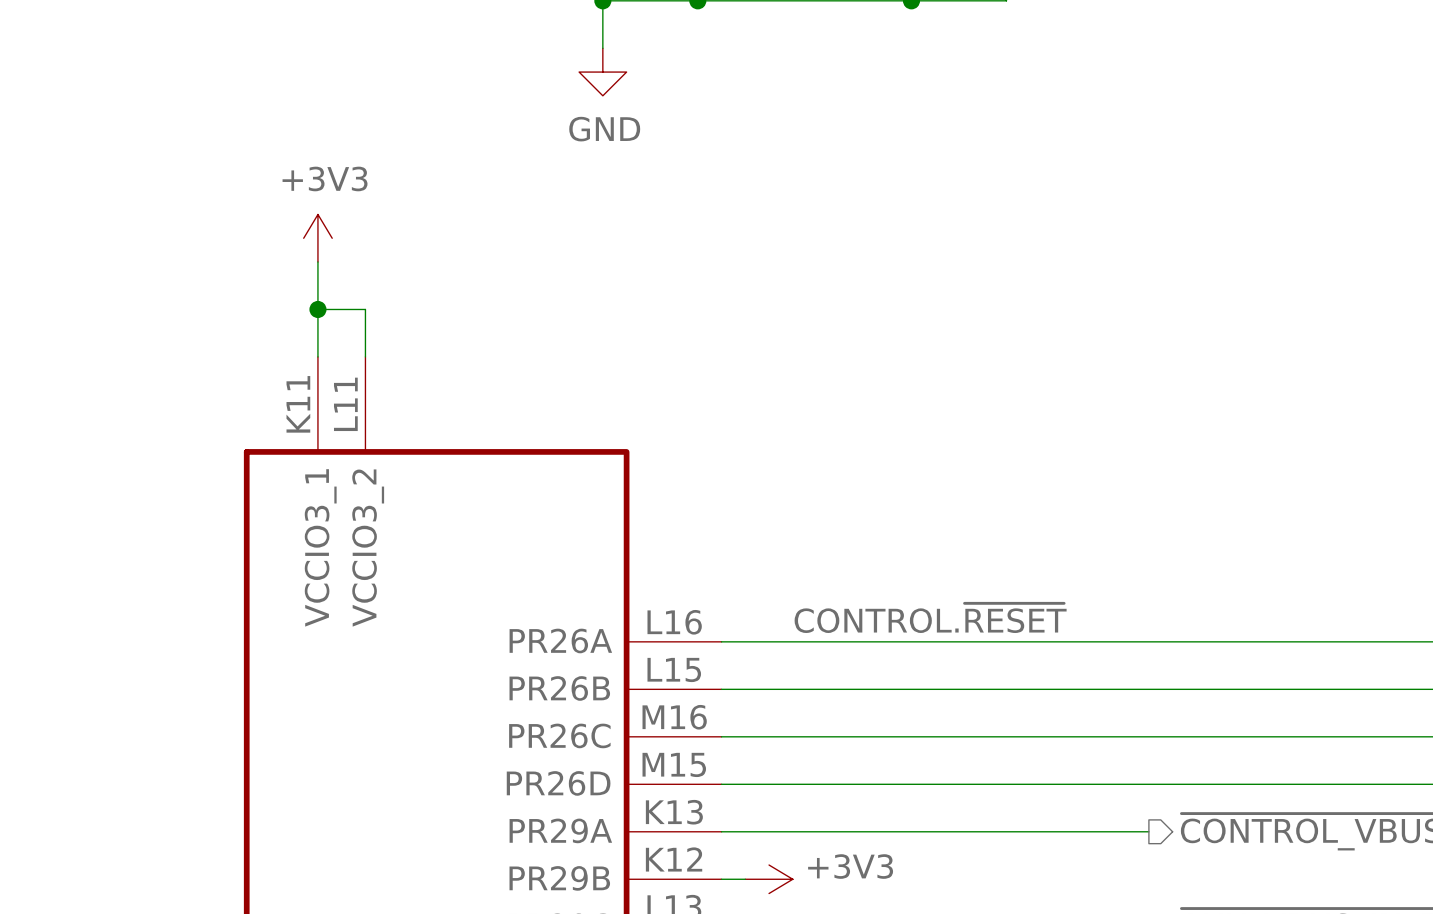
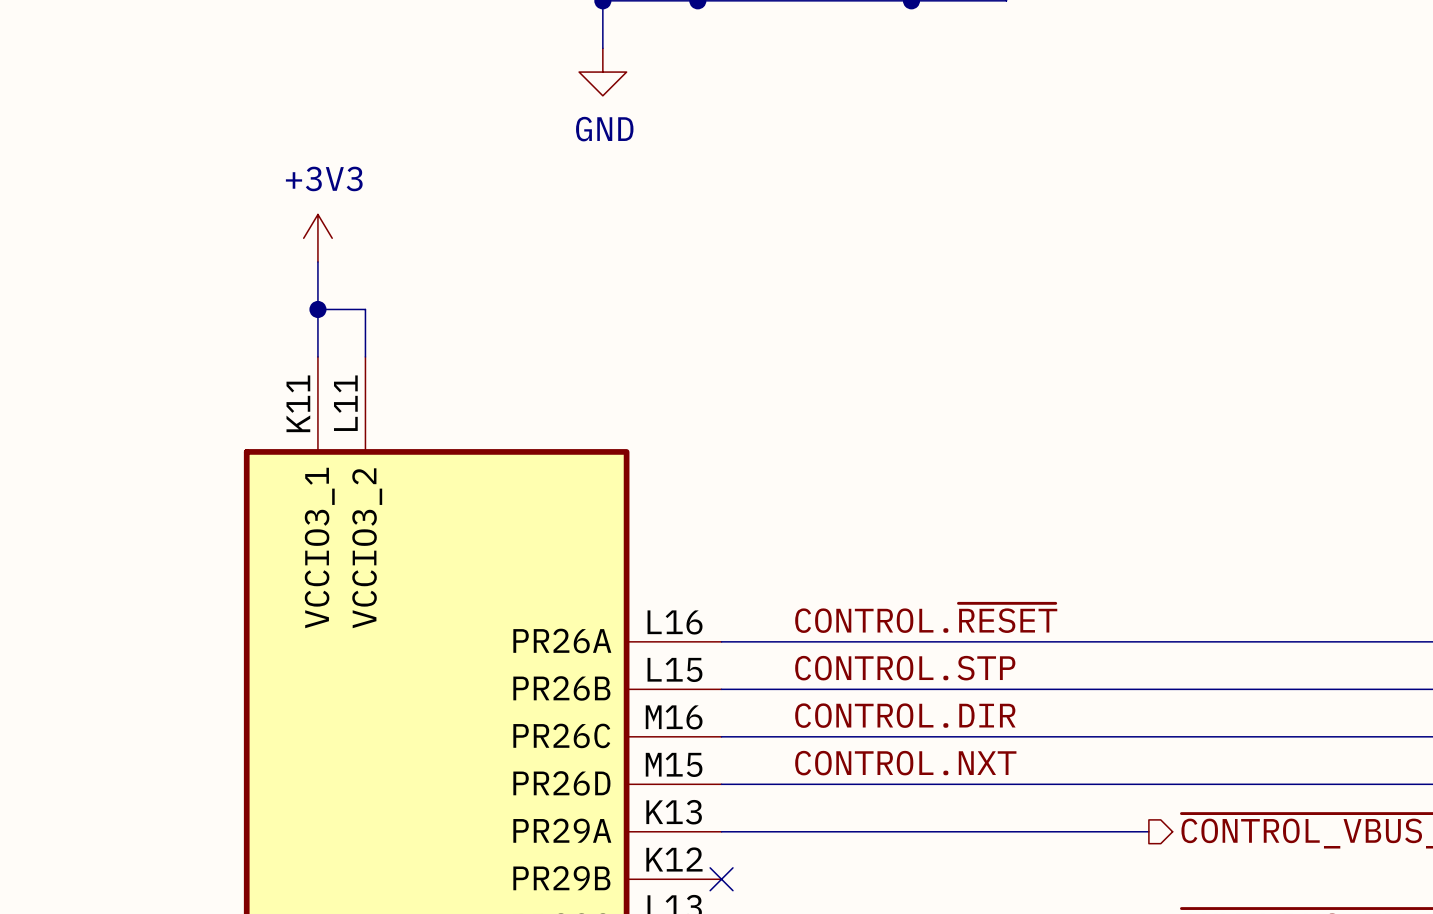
label: none -> CONTROL.STP (905, 668)
label: none -> CONTROL.DIR (905, 715)
label: none -> CONTROL.NXT (905, 763)
wire: (721, 879) (745, 879) -> none
no-connect mark: none -> (721, 879)
power symbol: +3V3 (769, 879) -> none

